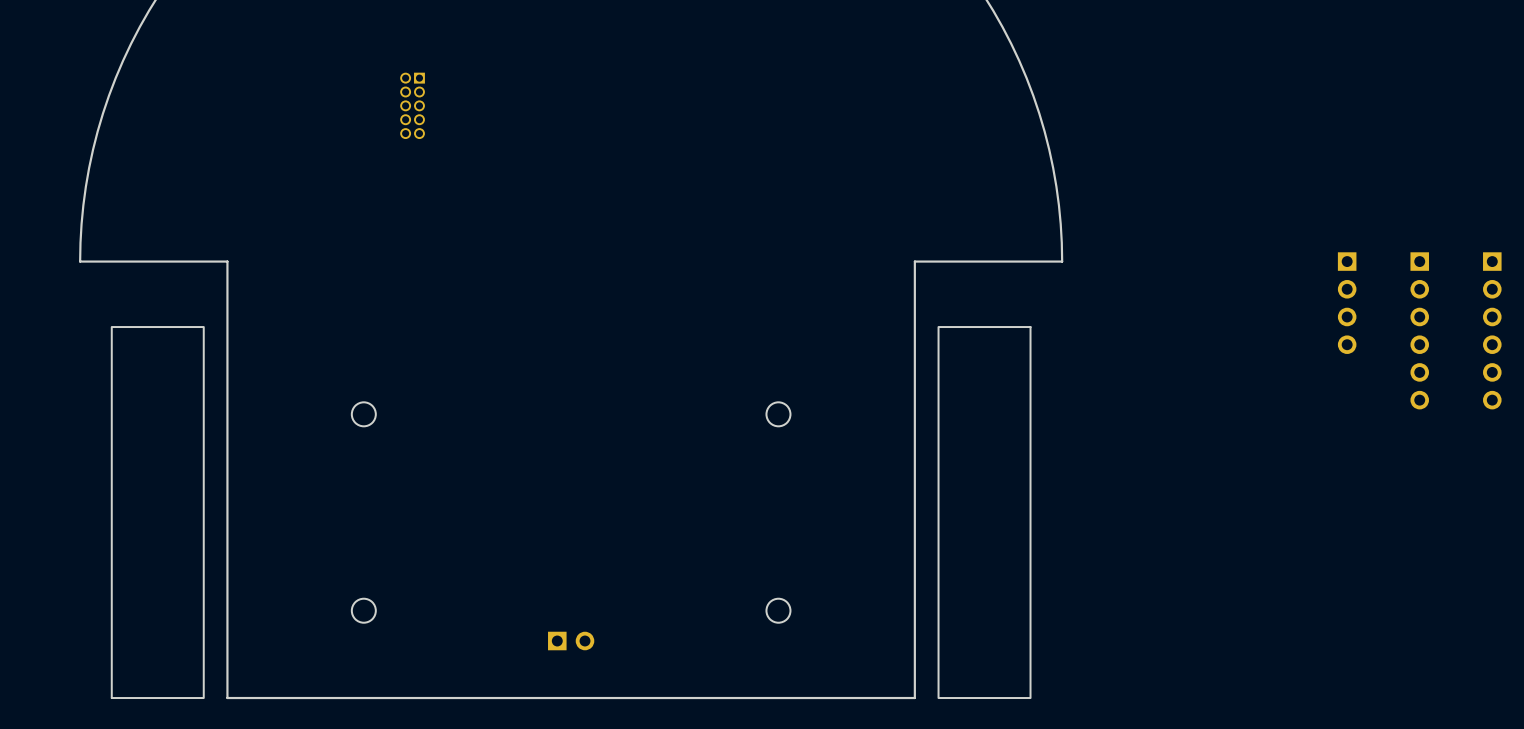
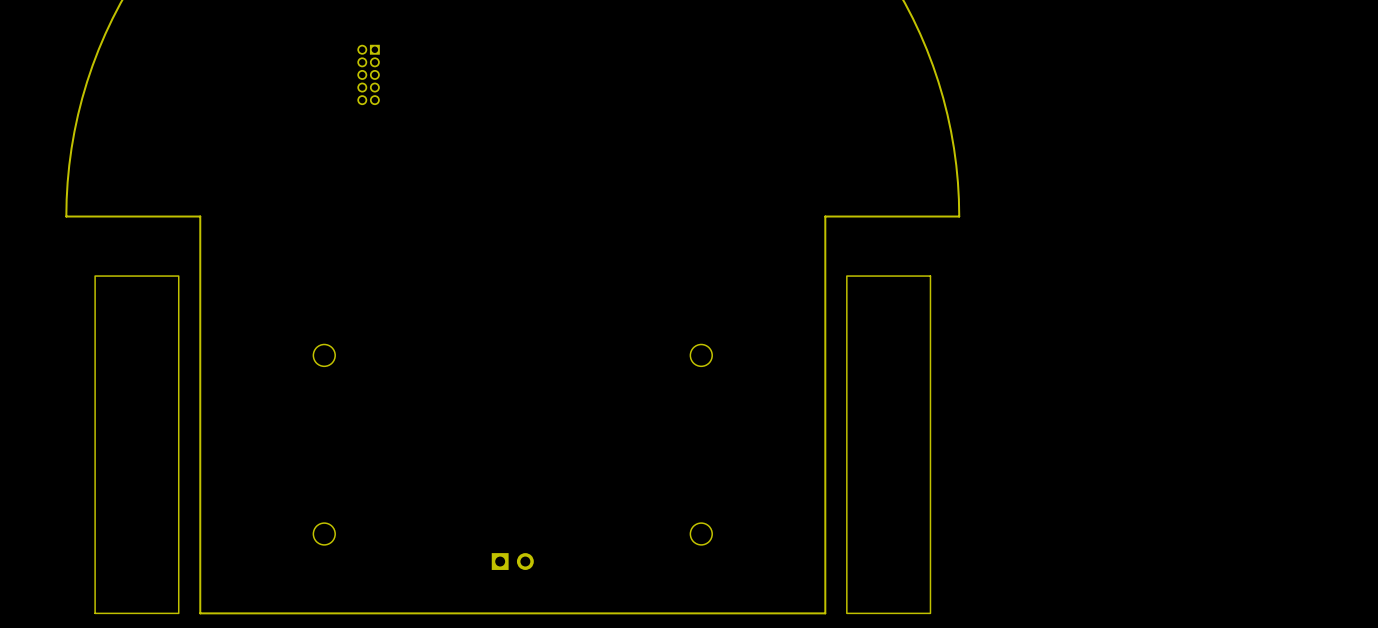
part: (1347, 303) -> none
part: (1419, 330) -> none
part: (1492, 330) -> none

